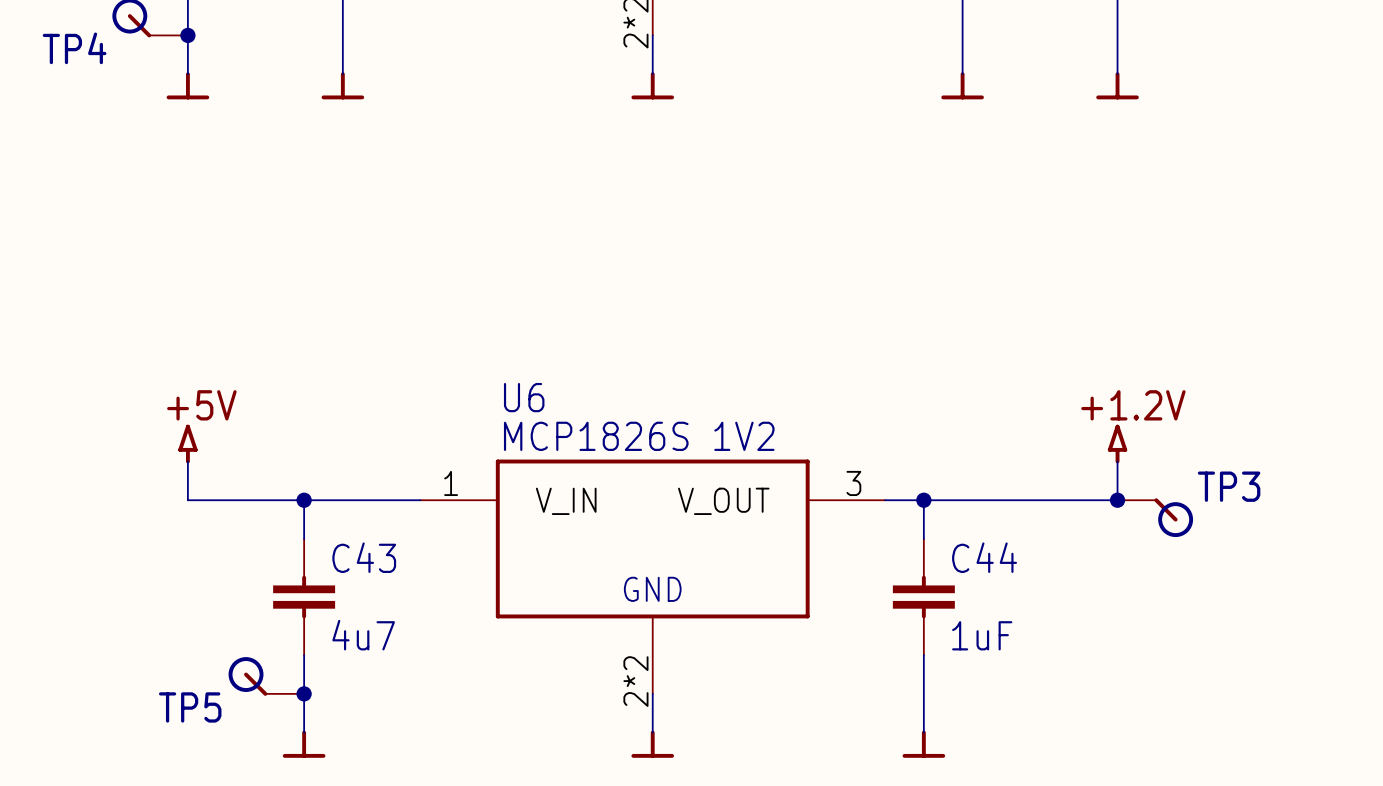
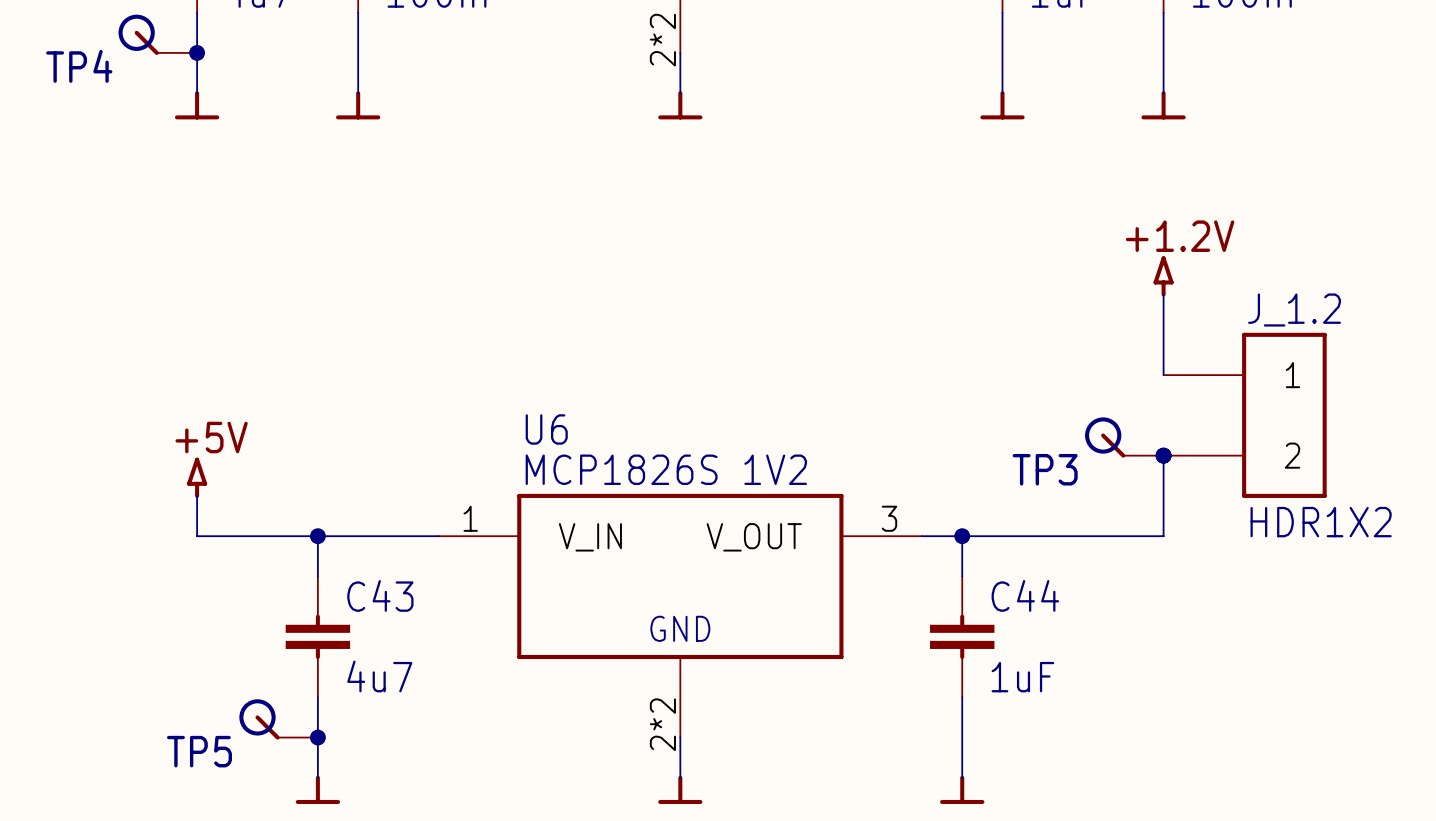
wire: none -> (1163, 294) (1163, 375)
J_1.2: none -> HDR1X2 (1245, 415)
power symbol position: (1117, 444) -> (1163, 276)
junction position: (1117, 500) -> (1163, 455)
TP3 position: (1155, 517) -> (1124, 437)
TP3 rotation: 0° (1173, 517) -> 180° (1105, 437)

